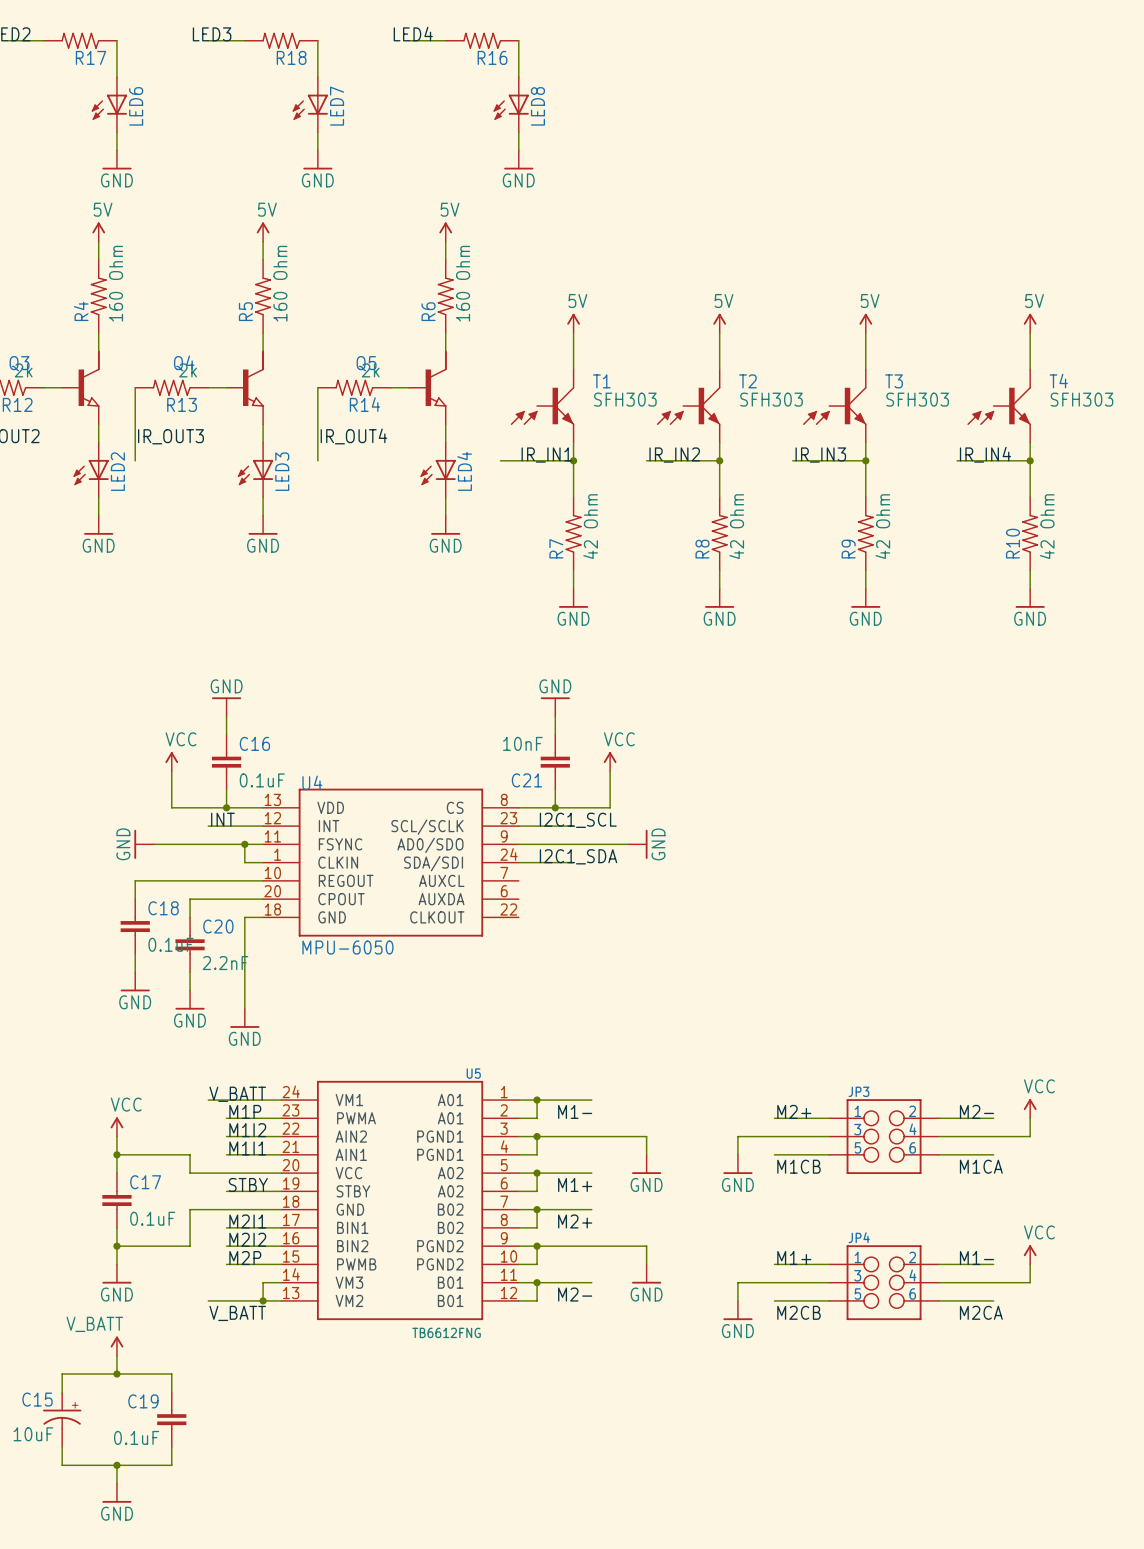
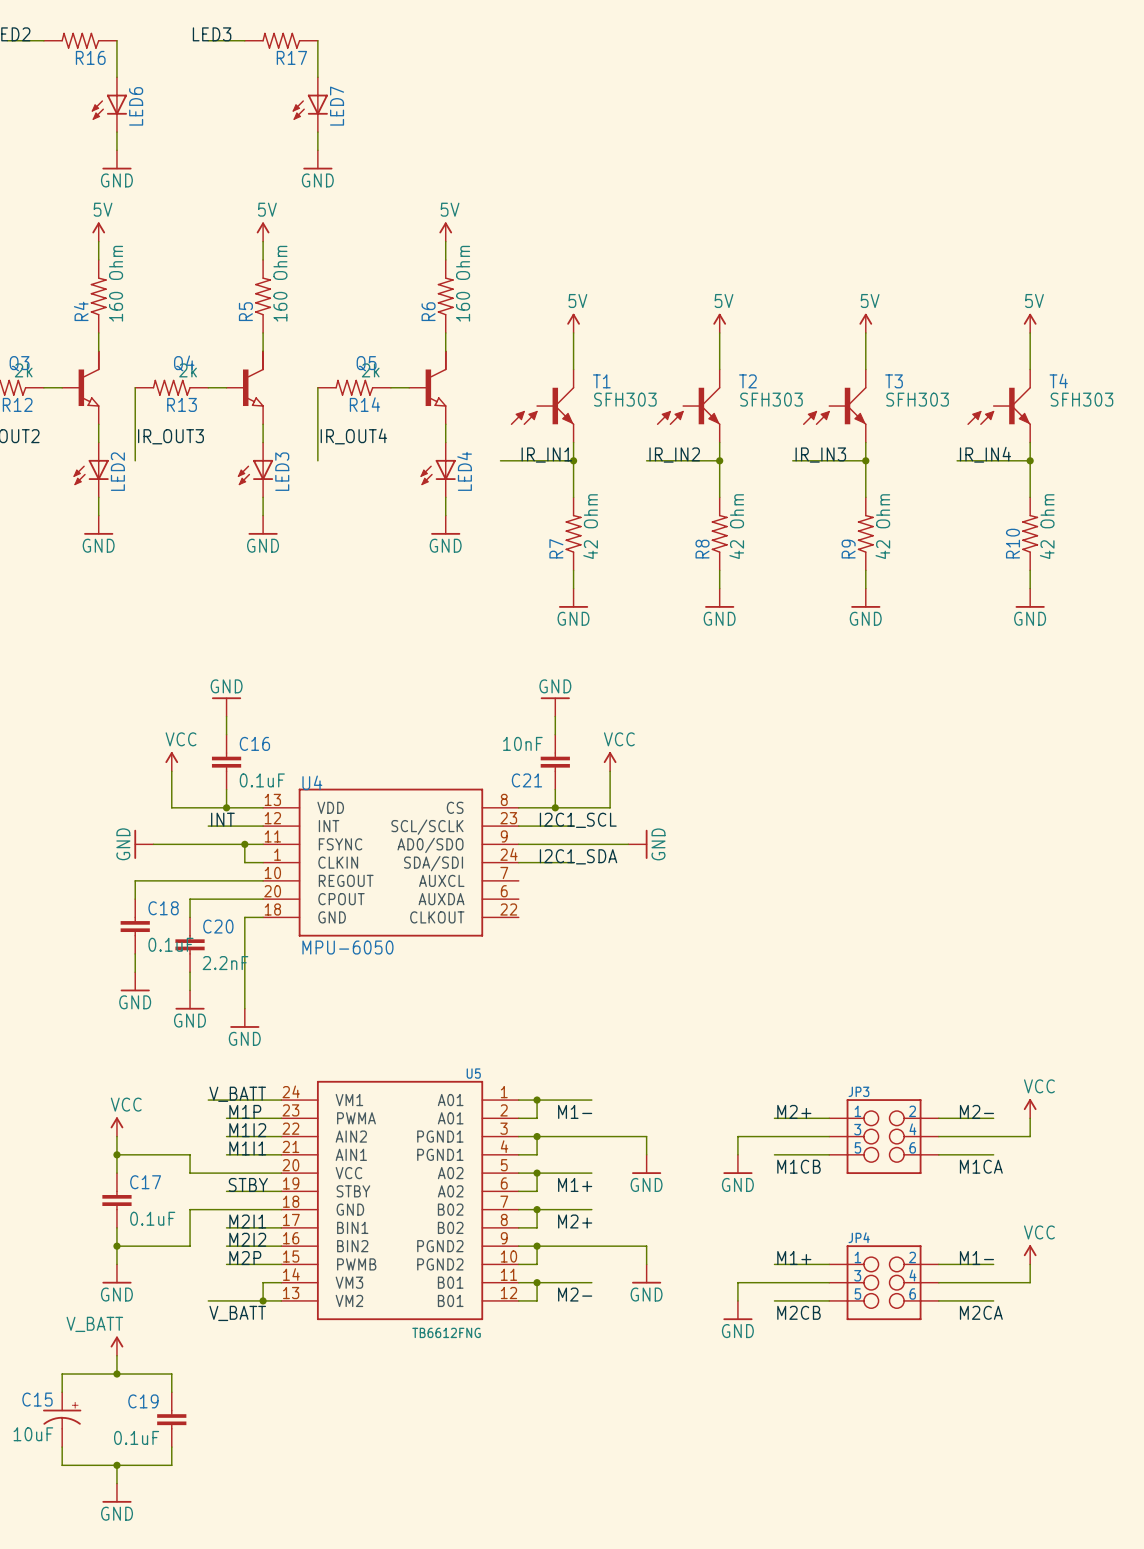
label: LED4 (413, 34) -> none
wire: (409, 40) (445, 40) -> none
R16: (482, 40) -> none
wire: (518, 40) (518, 77) -> none
R17 name: R17 (91, 57) -> R16 (90, 57)
R18 name: R18 (291, 57) -> R17 (291, 57)
LED8: (511, 104) -> none
wire: (518, 132) (518, 150) -> none
power symbol: GND (518, 159) -> none

